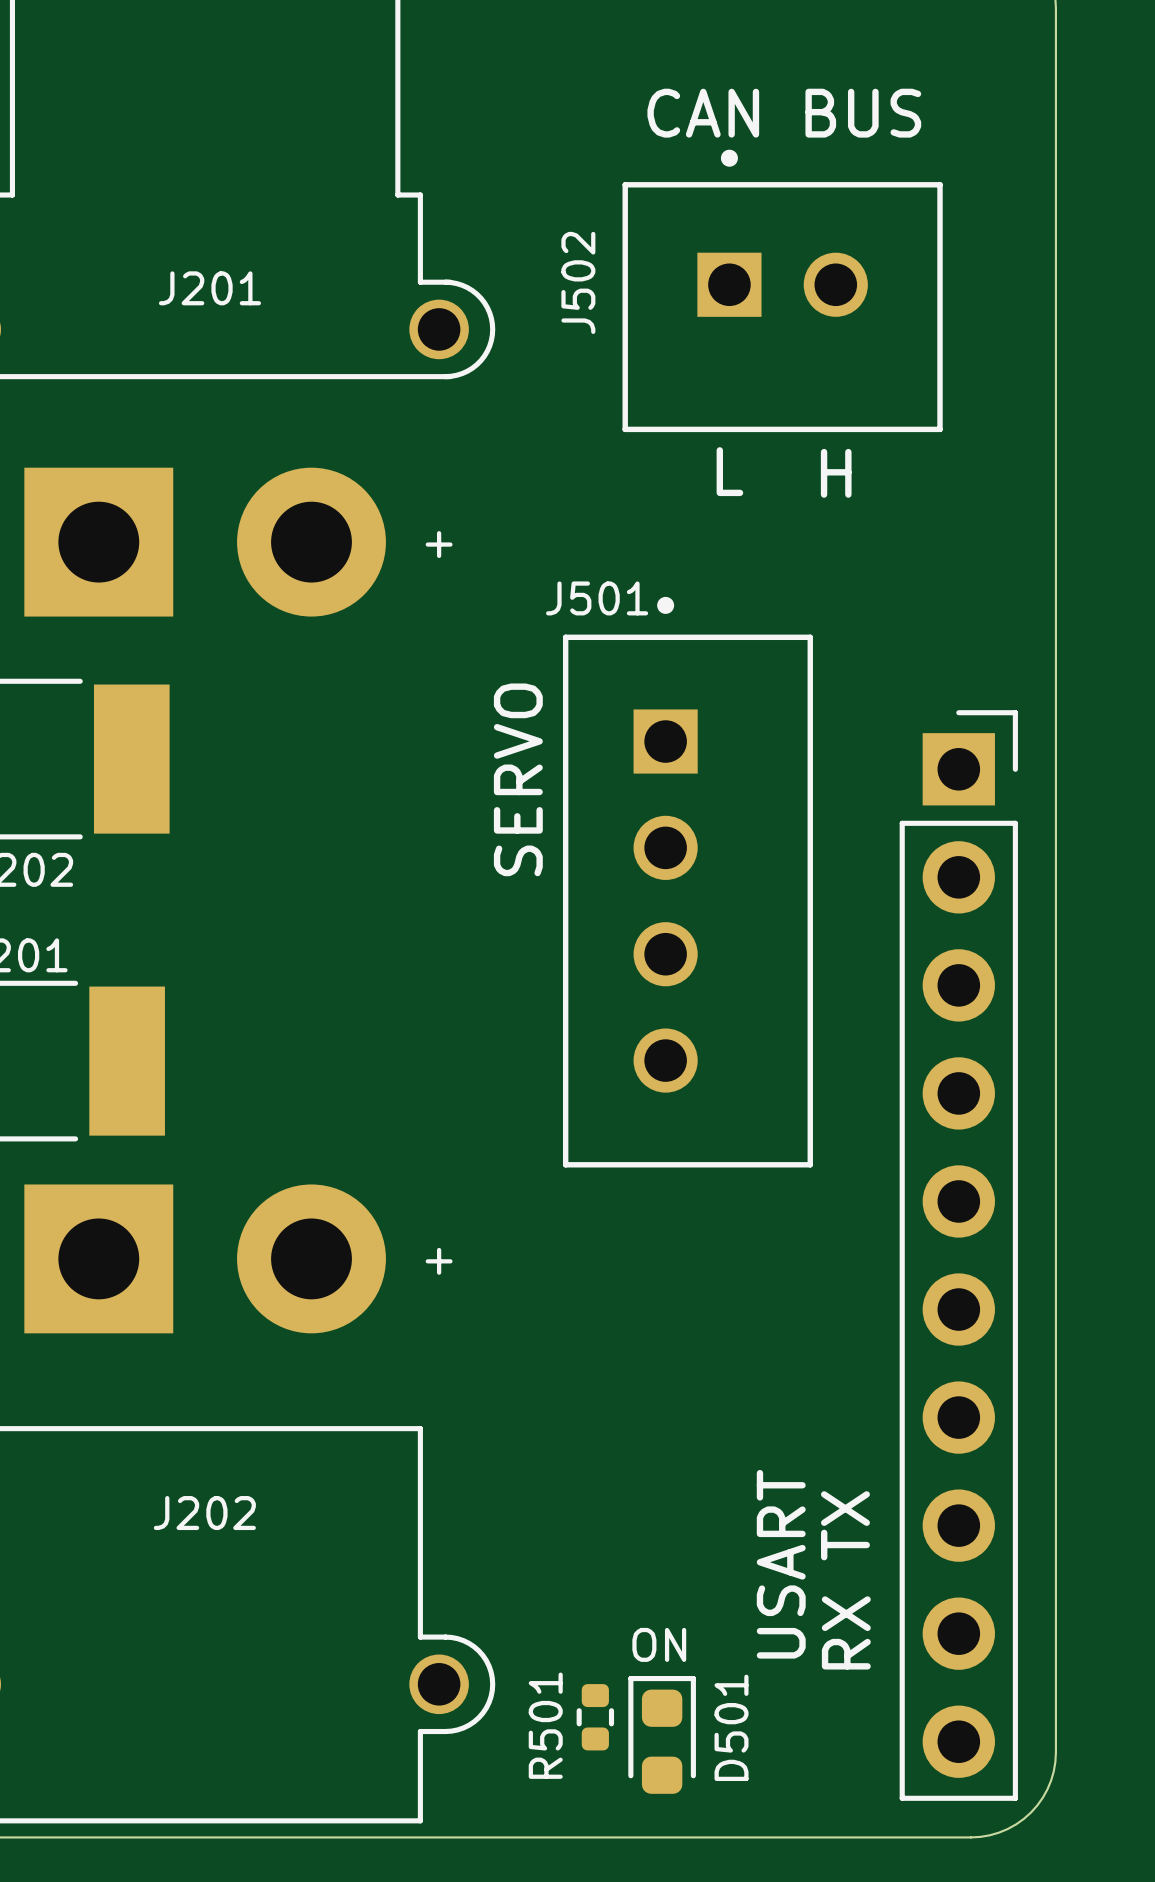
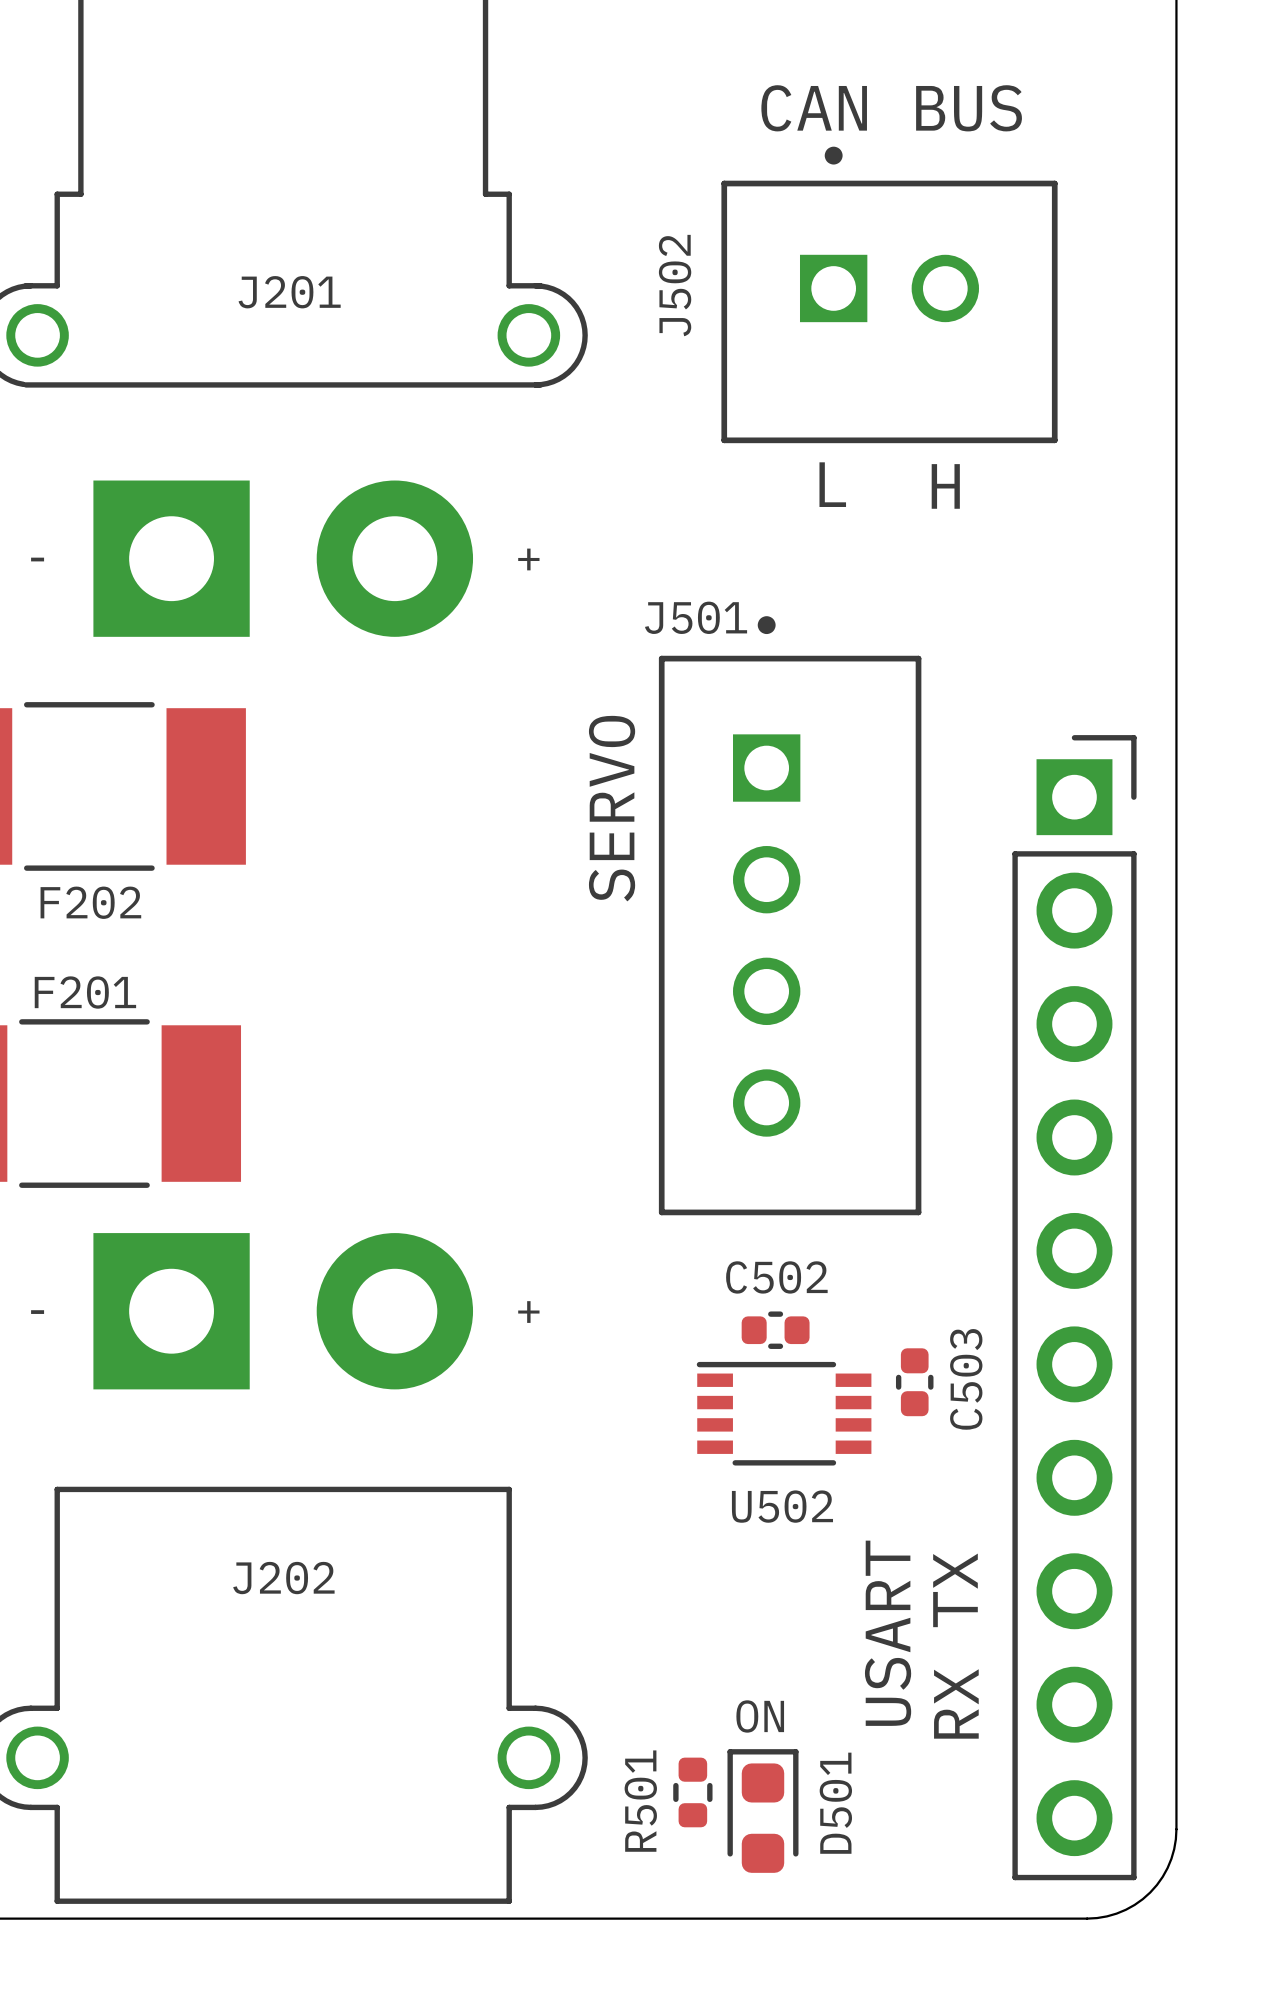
C502: none -> (775, 1330)
C503: none -> (914, 1382)
U502: none -> (784, 1413)

